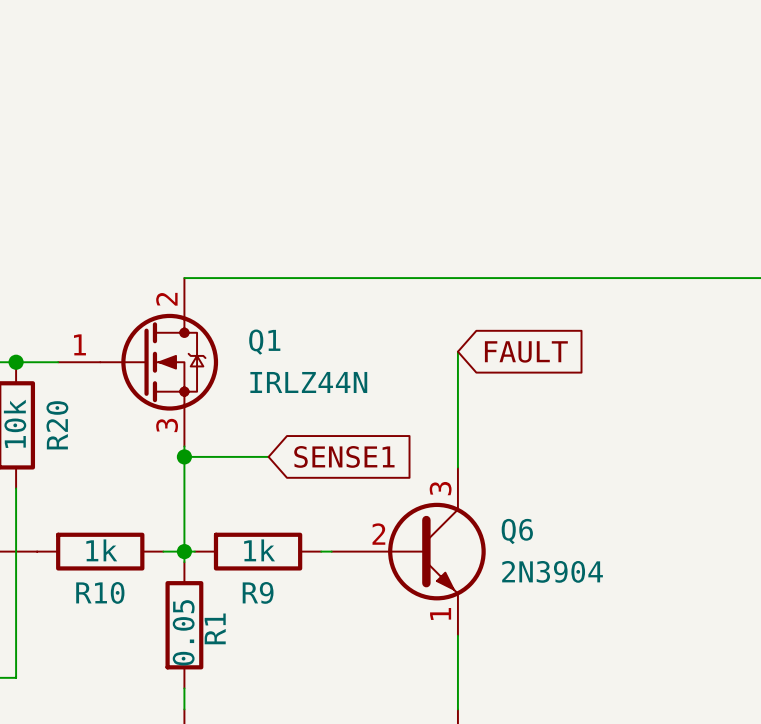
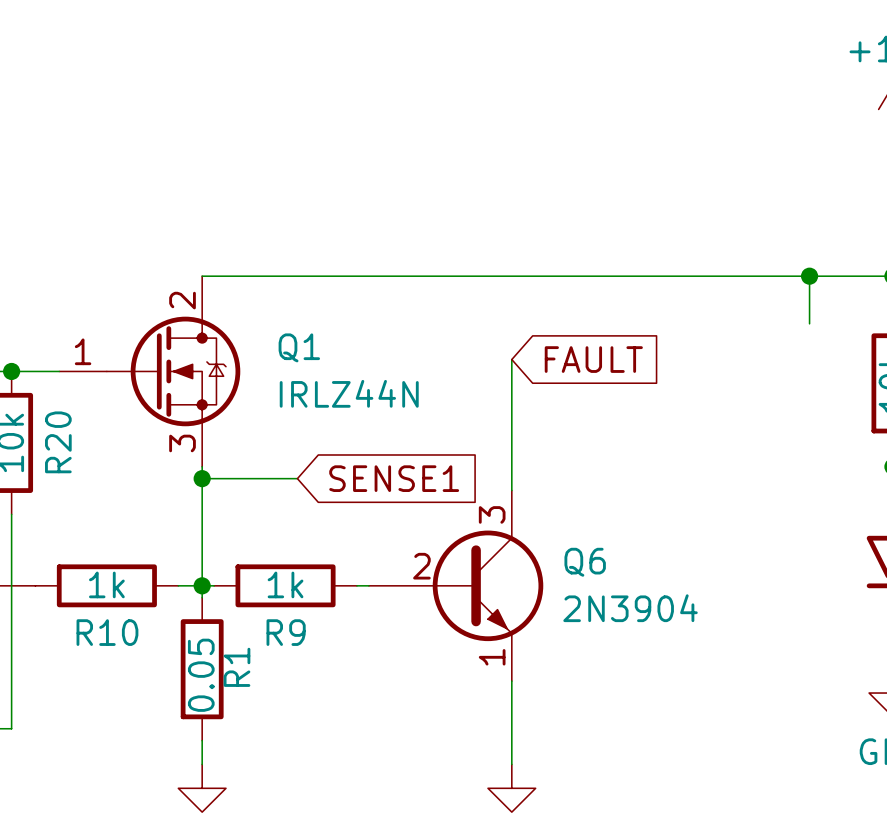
wire: none -> (809, 276) (809, 323)
junction: none -> (809, 276)

